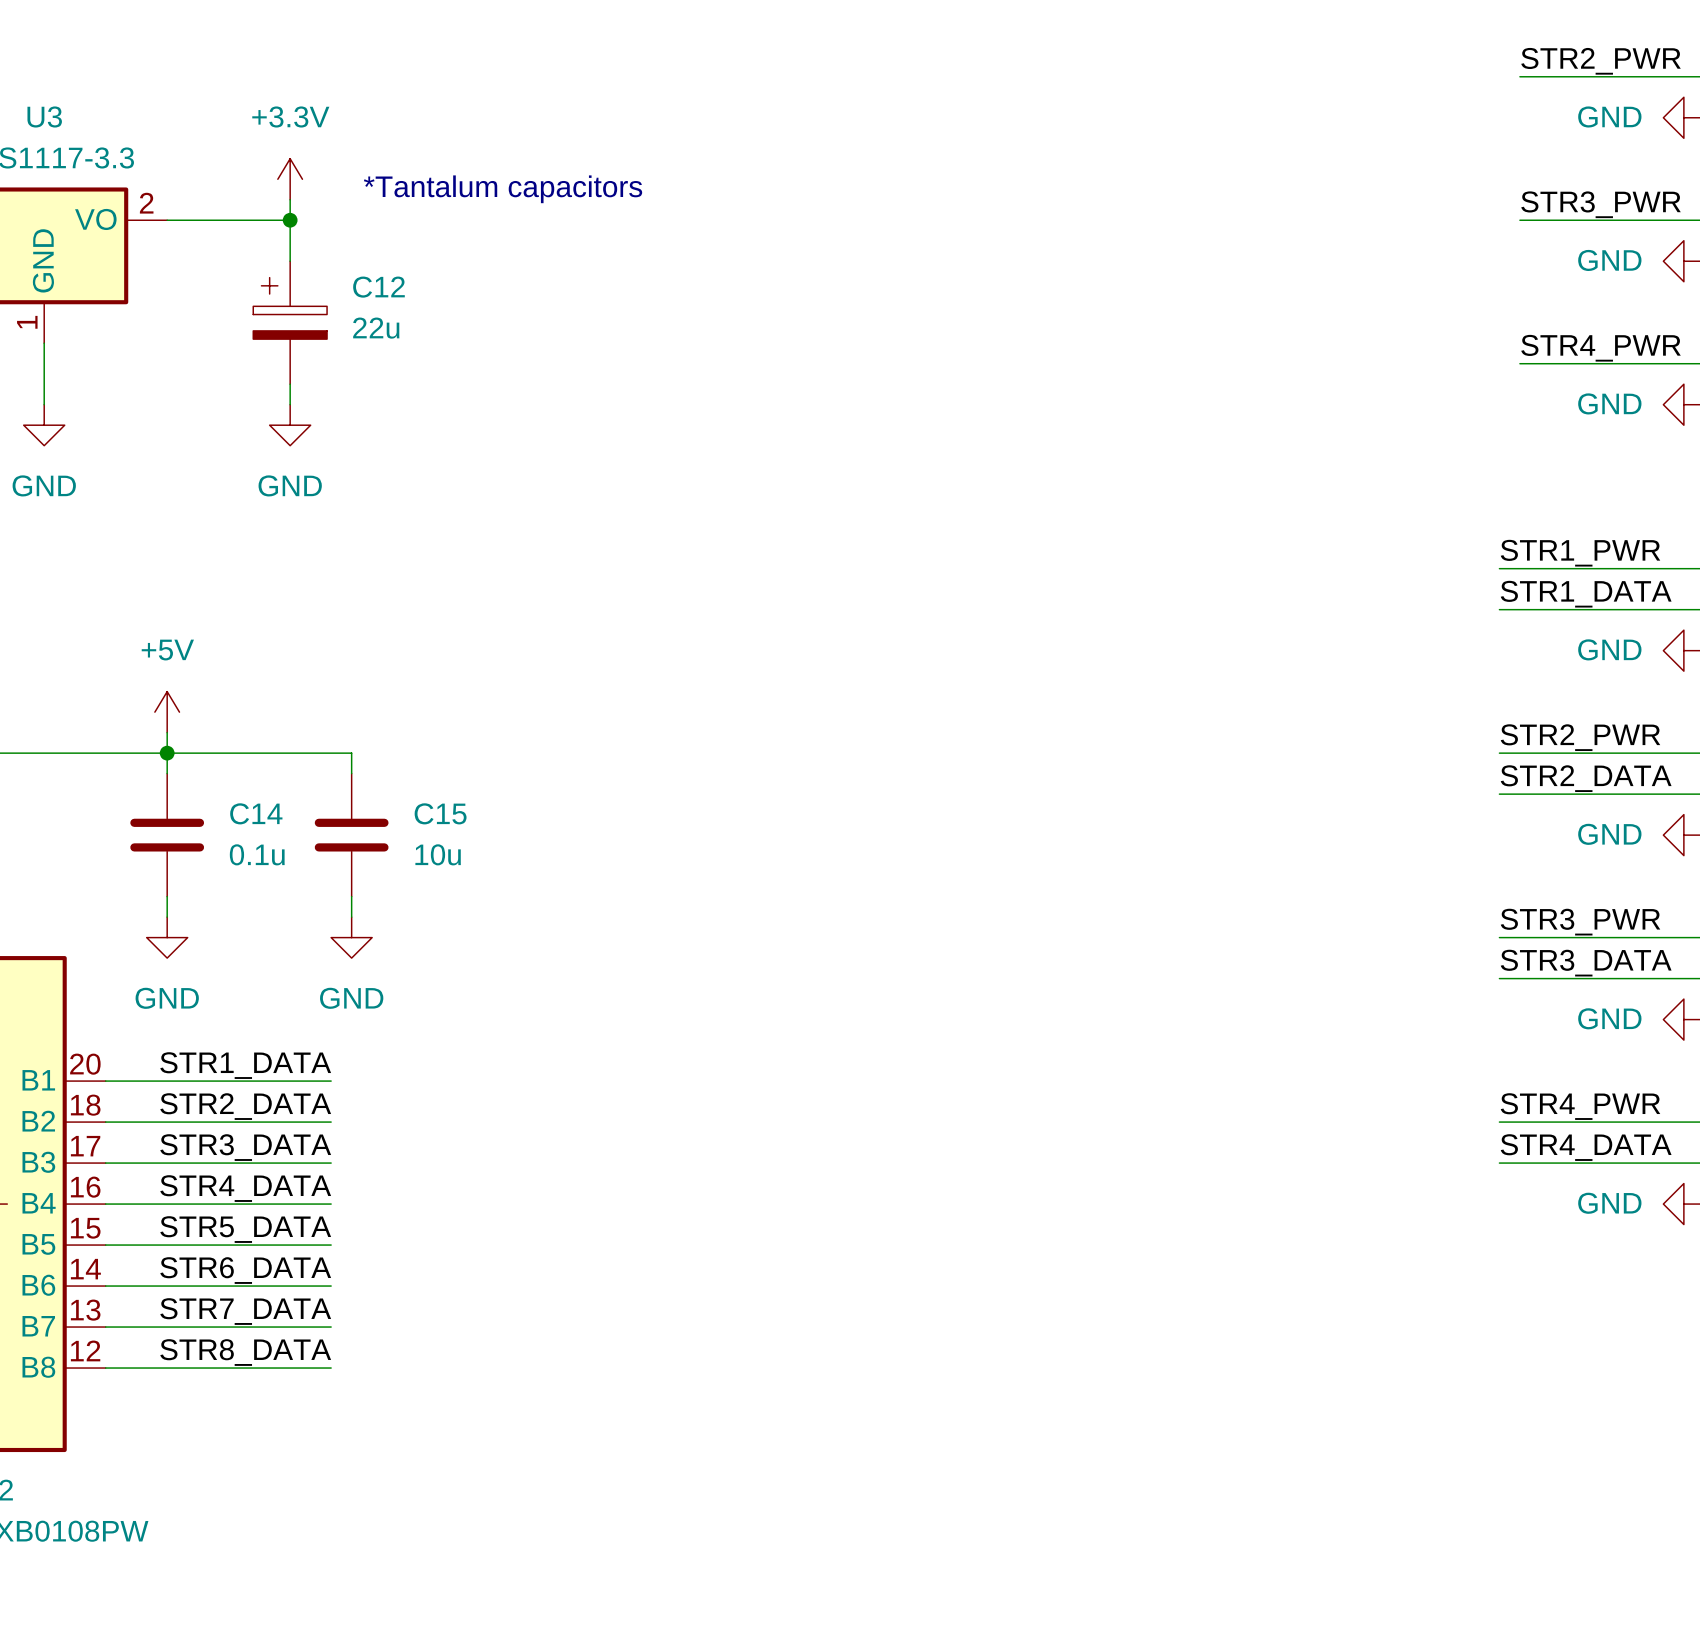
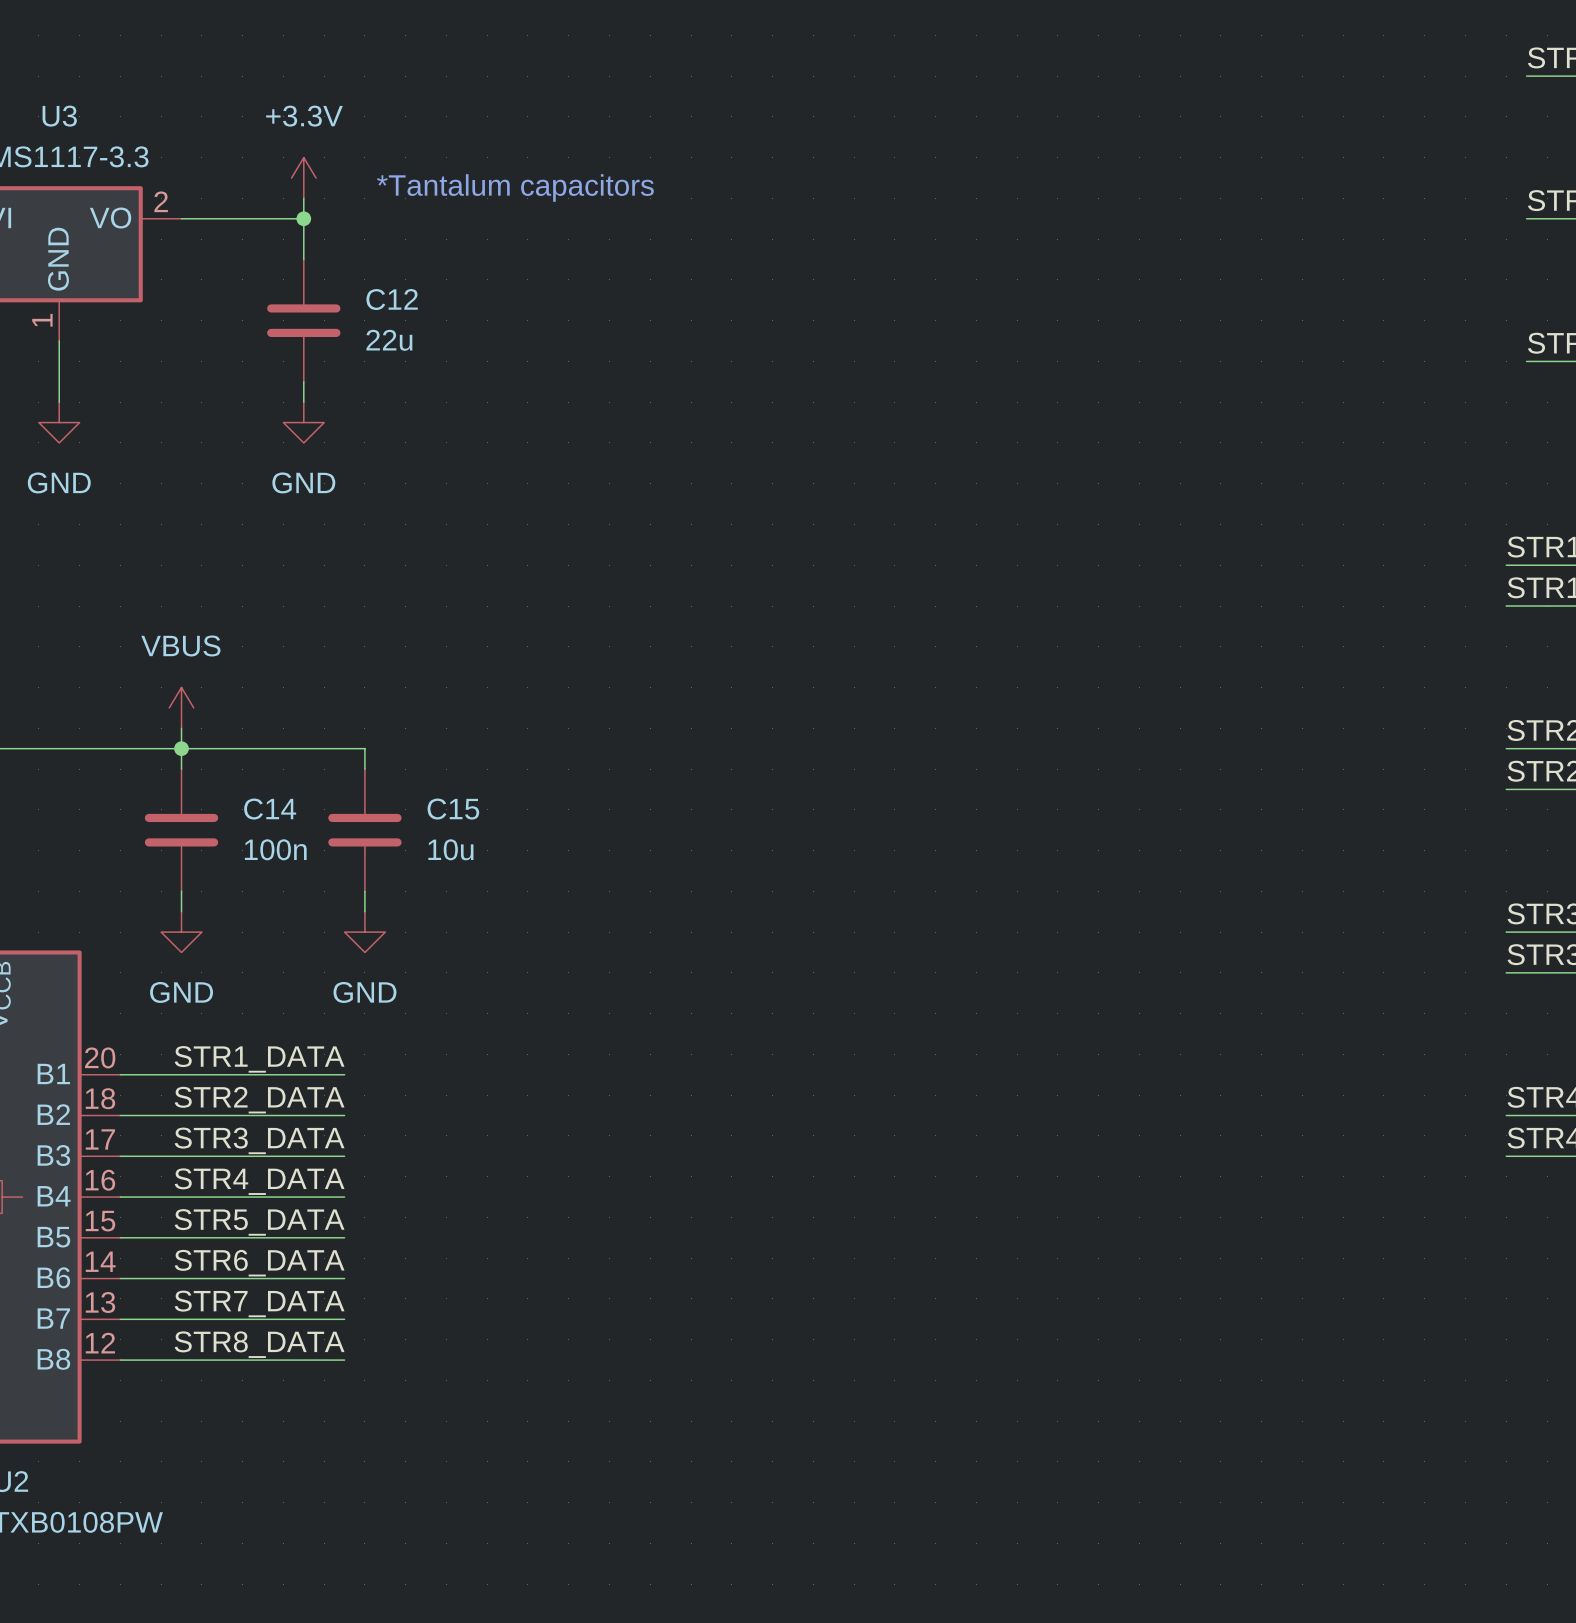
C12 symbol: [253, 261, 328, 385] -> [267, 259, 341, 382]
power symbol: +5V (167, 712) -> VBUS (181, 707)
C14 value: 0.1u (257, 854) -> 100n (275, 849)

